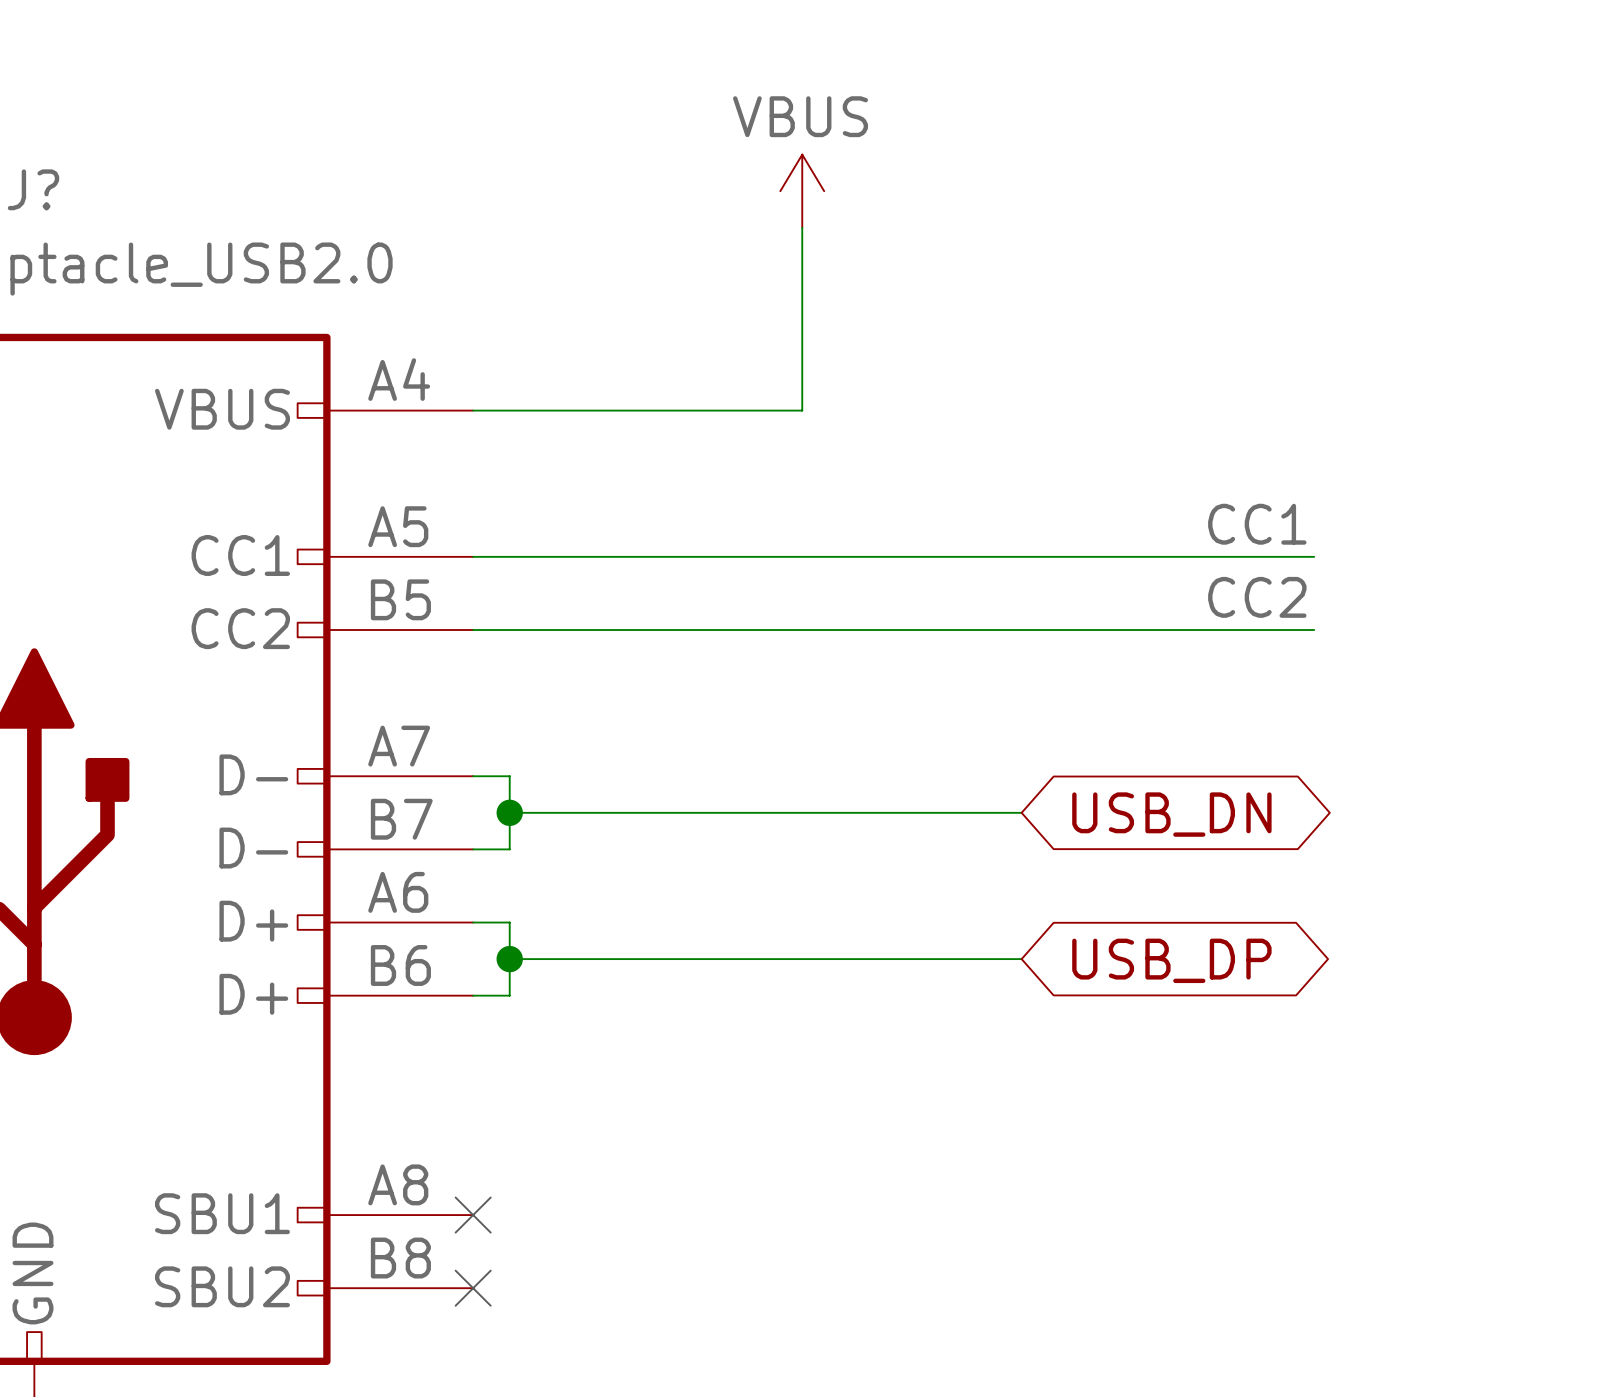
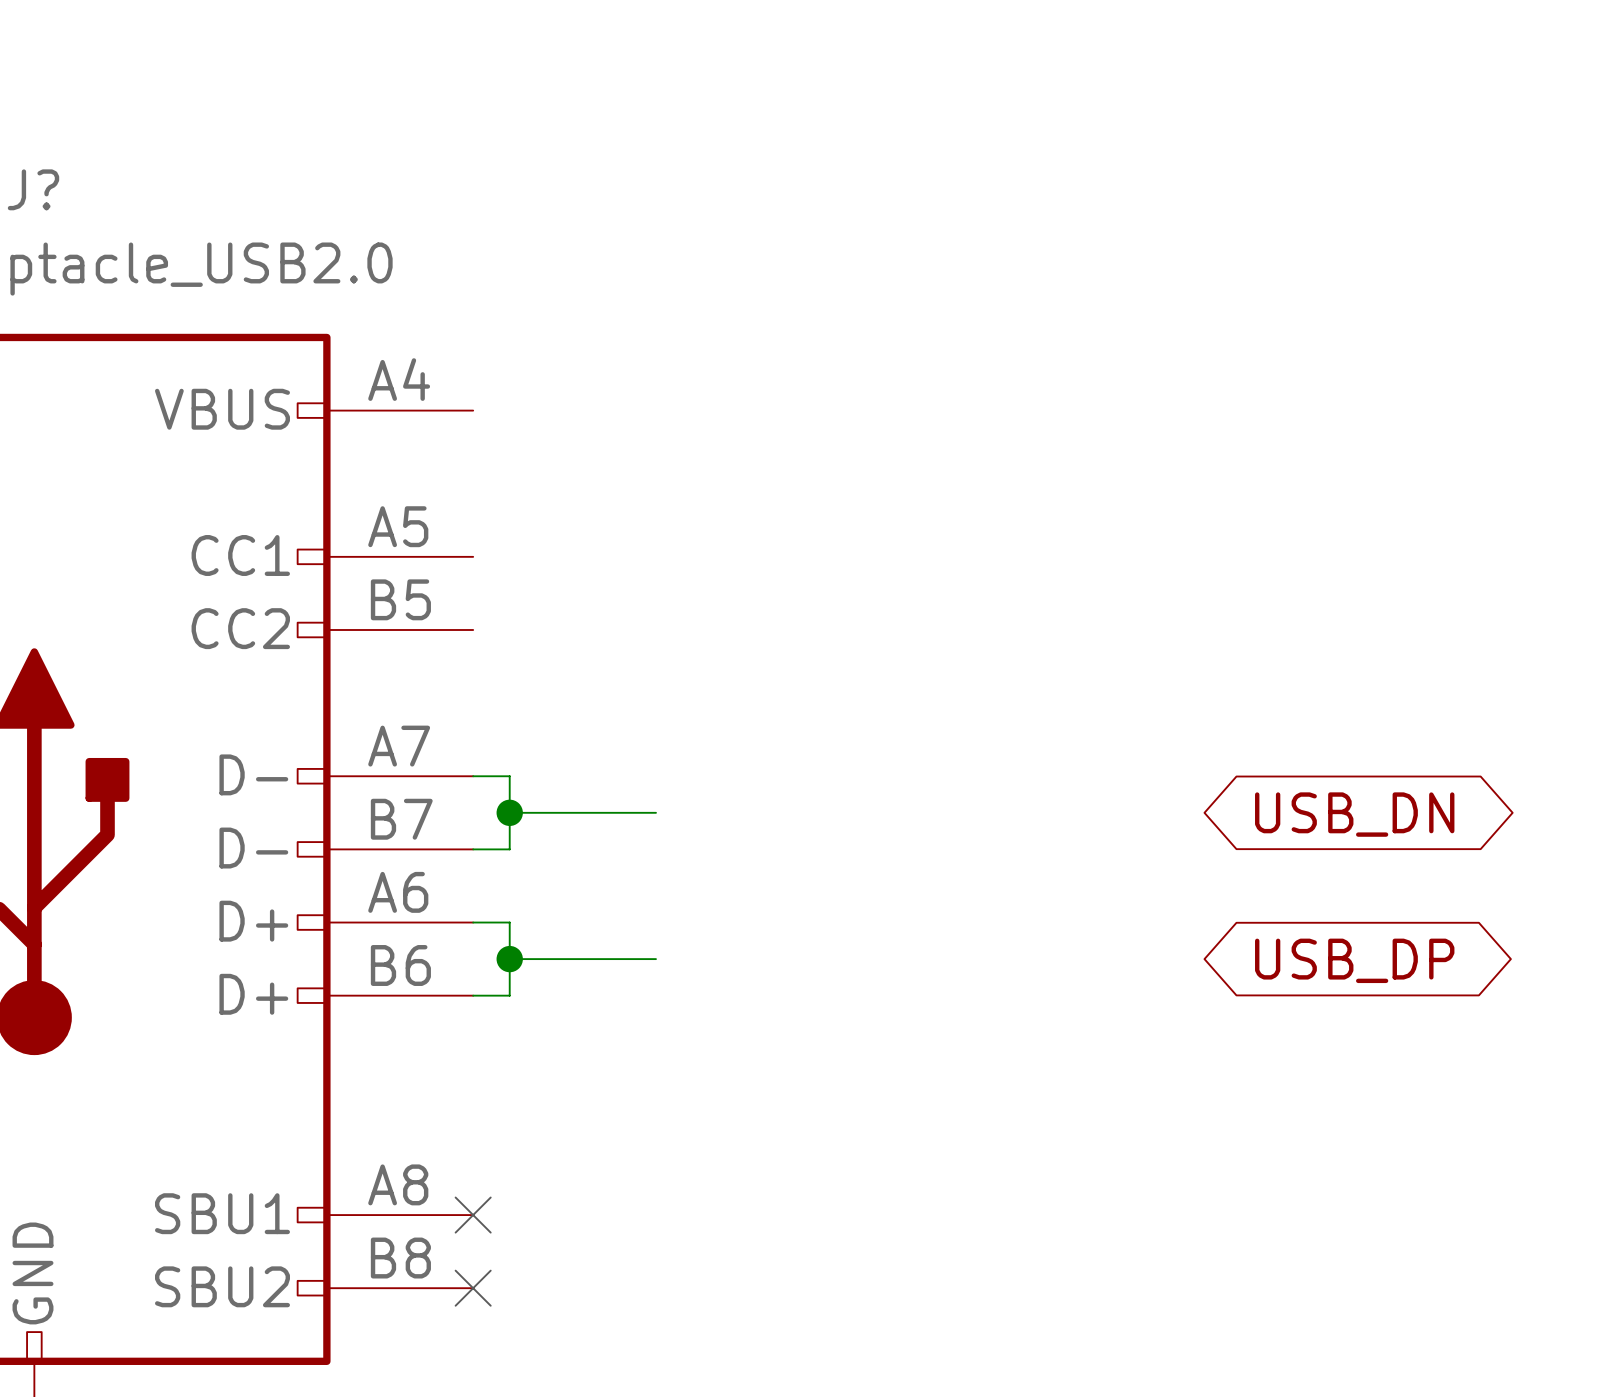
power symbol: VBUS (802, 191) -> none
wire: (802, 227) (802, 410) (473, 410) -> none
label: CC1 (1257, 524) -> none
wire: (473, 556) (1314, 556) -> none
label: CC2 (1257, 597) -> none
wire: (473, 629) (1314, 629) -> none
wire: (655, 812) (1021, 812) -> none
global label position: USB_DN (1171, 814) -> USB_DN (1354, 814)
wire: (655, 959) (1021, 959) -> none
global label position: USB_DP (1171, 960) -> USB_DP (1354, 960)

